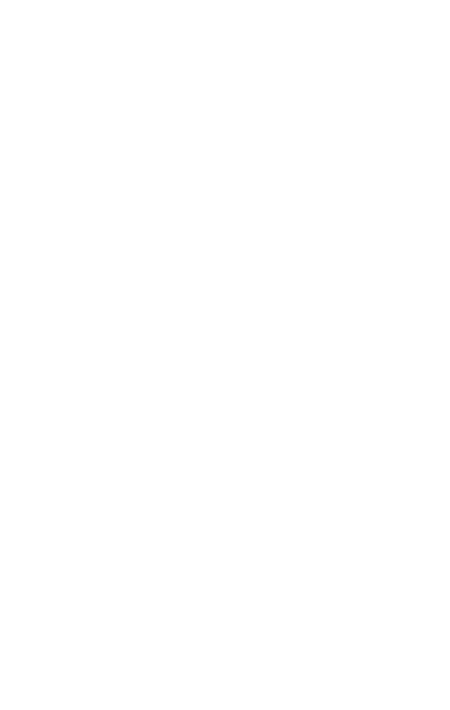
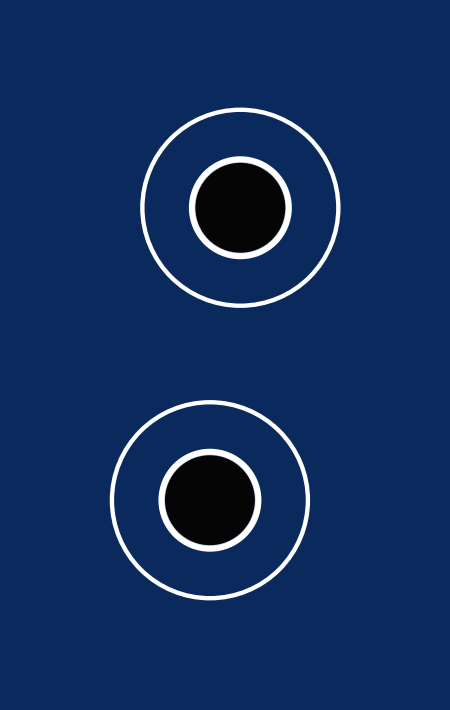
part: none -> (240, 207)
part: none -> (209, 500)

